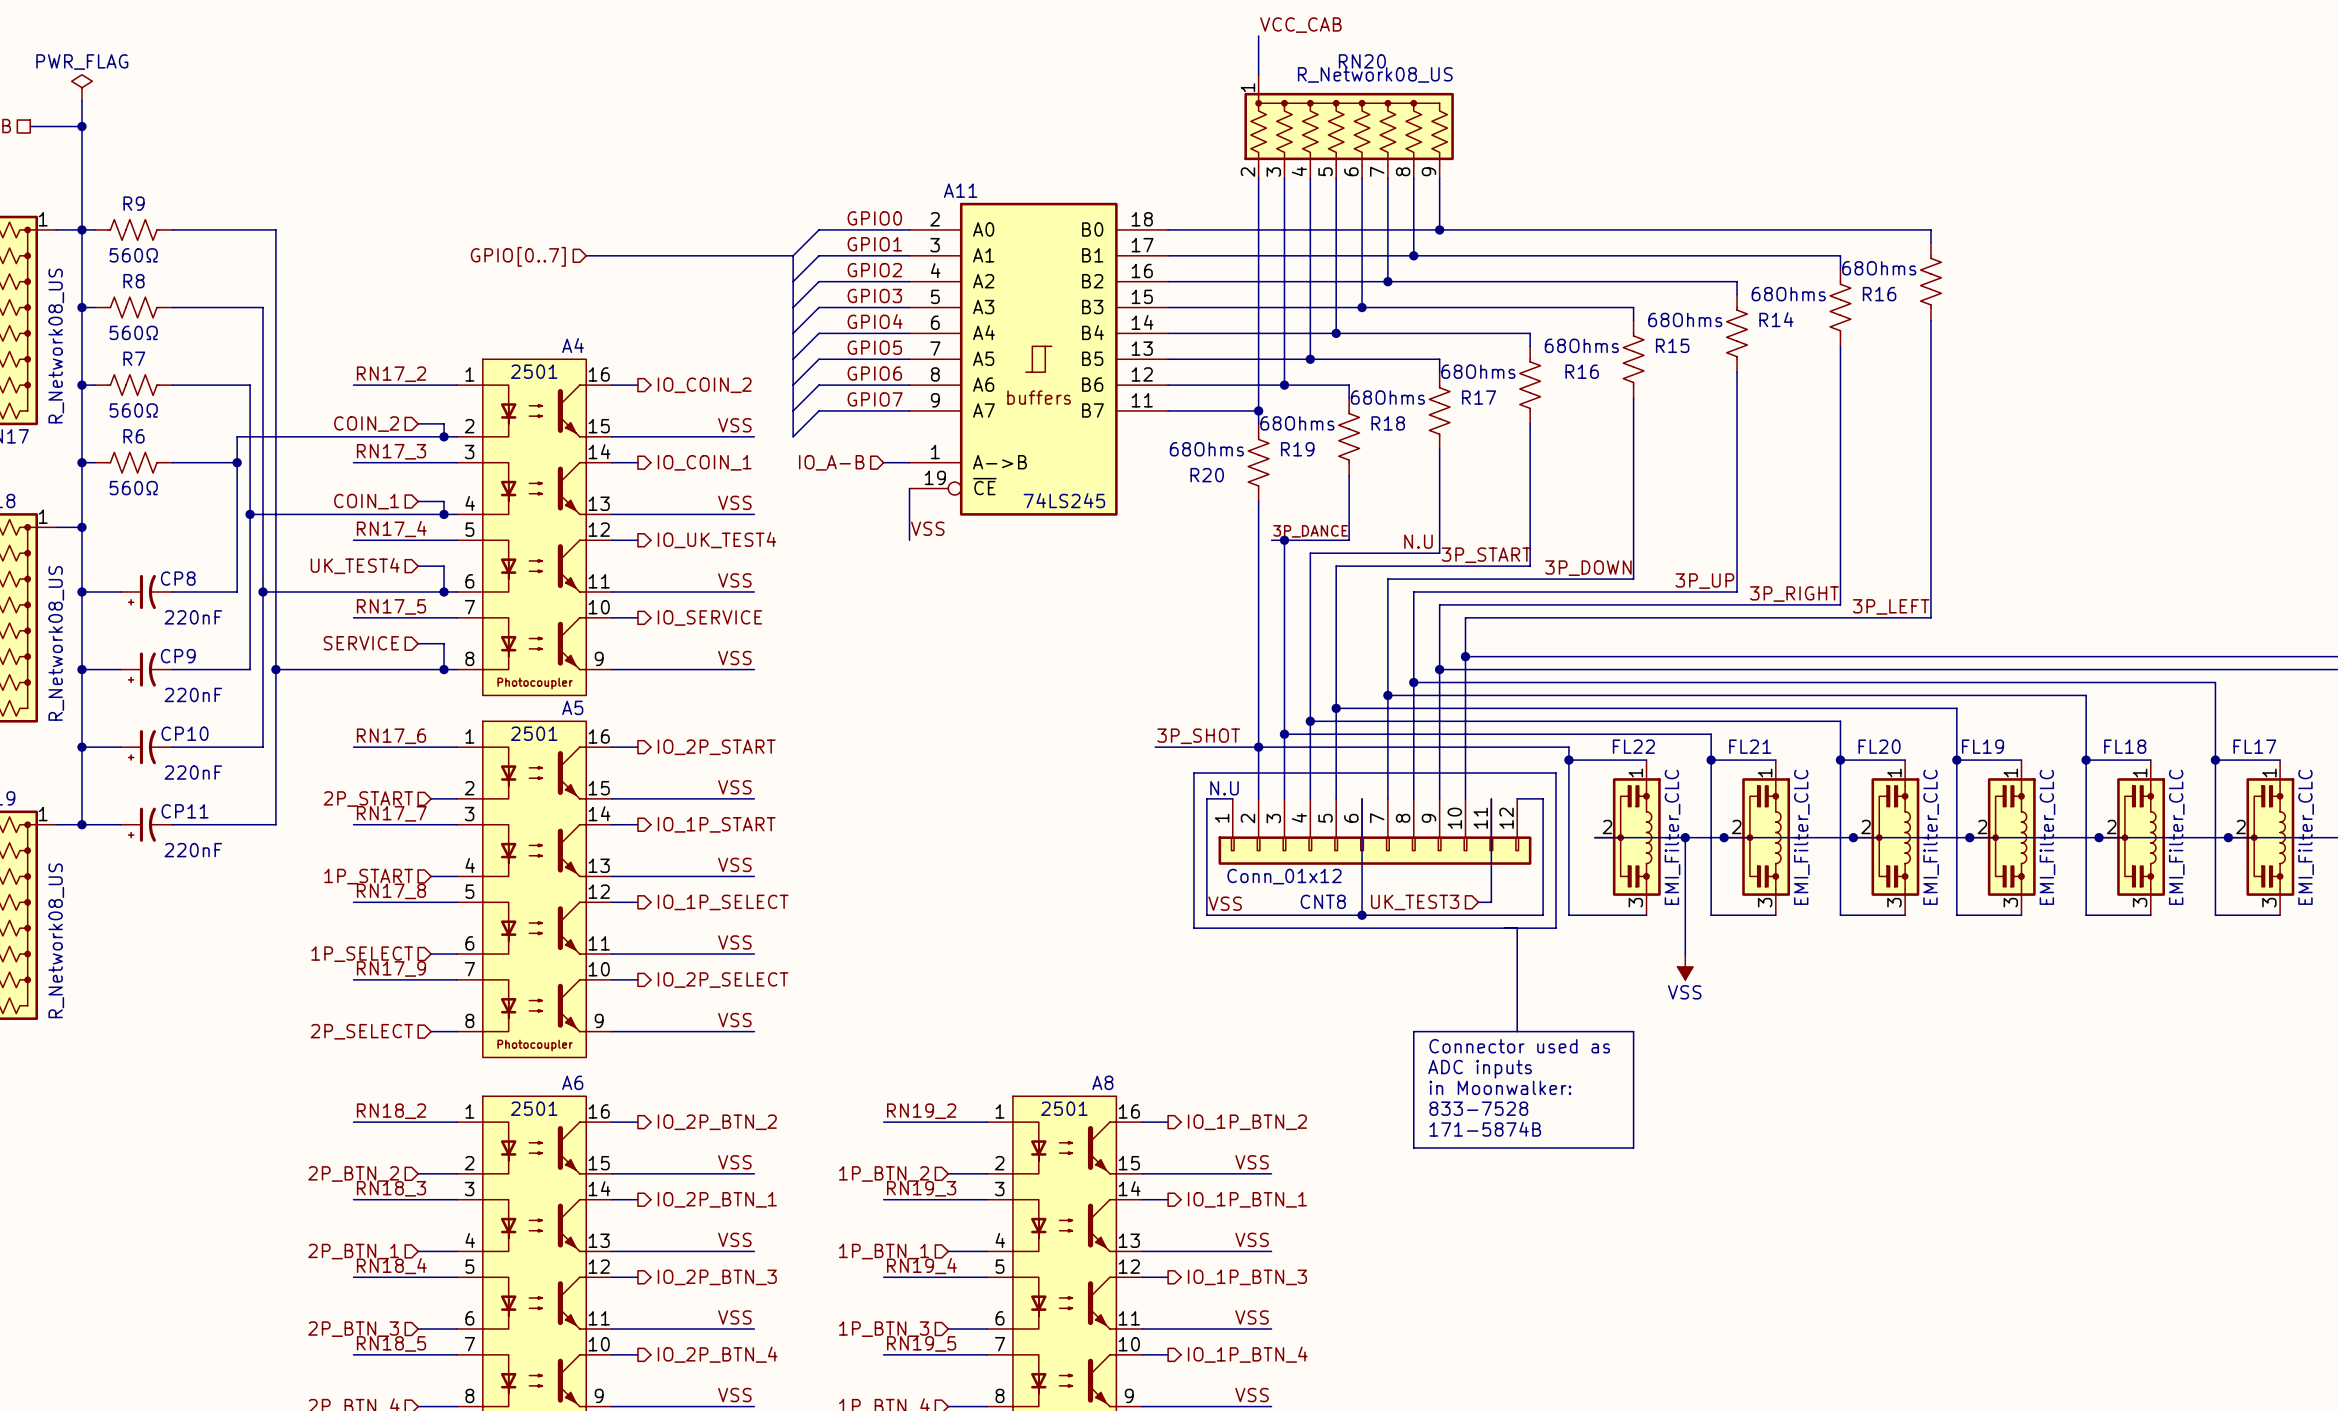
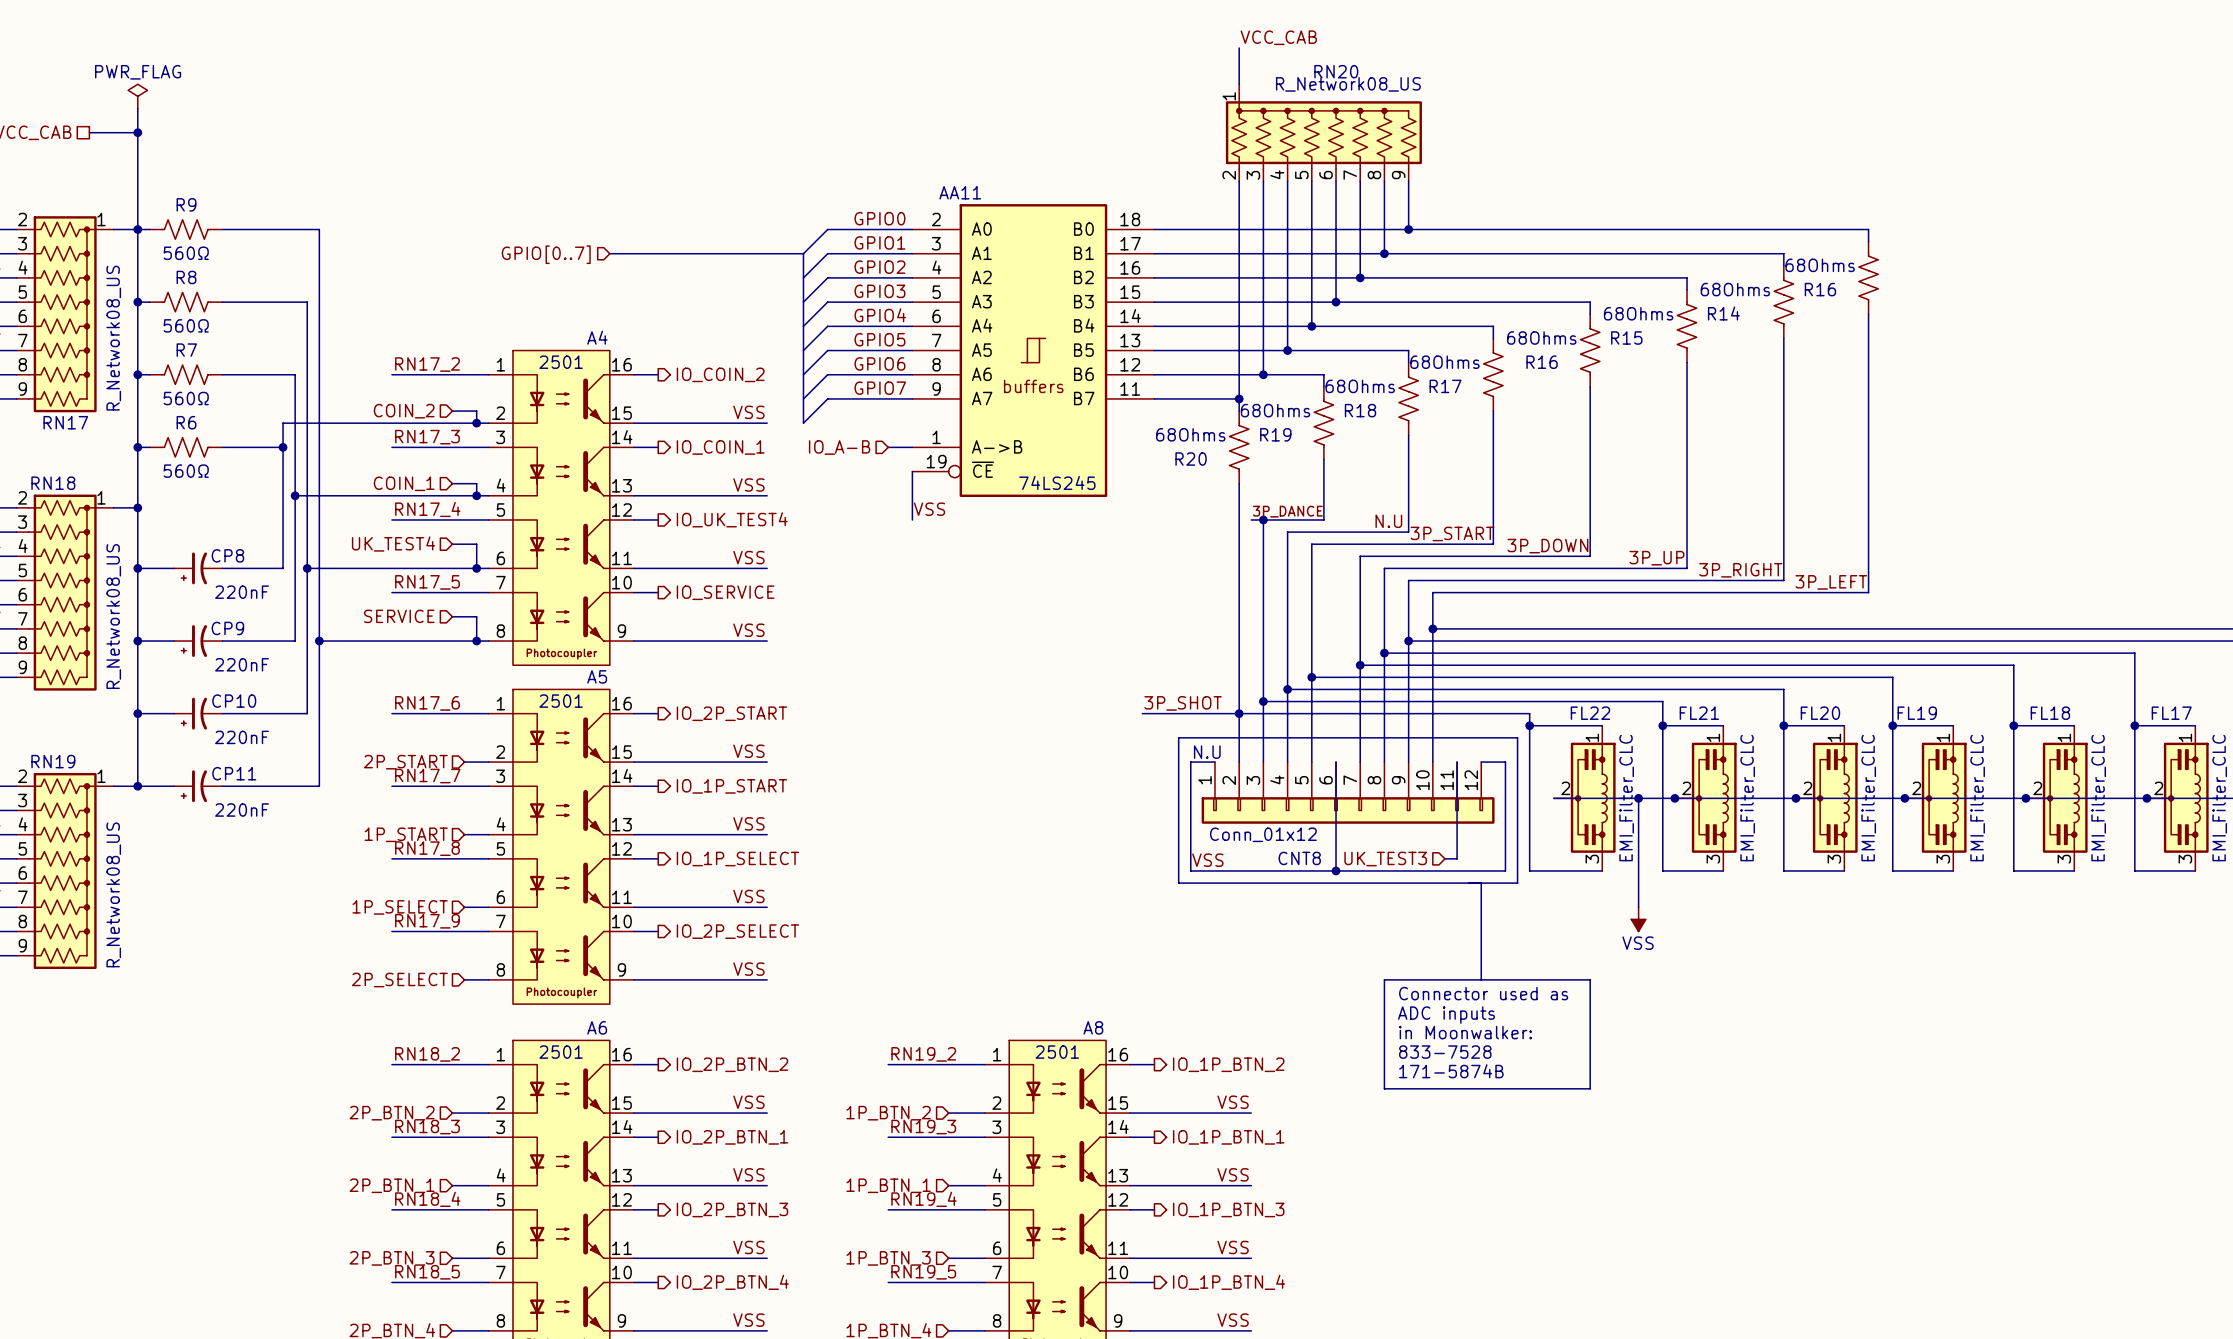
A11 name: A11 (960, 190) -> AA11 (960, 192)

